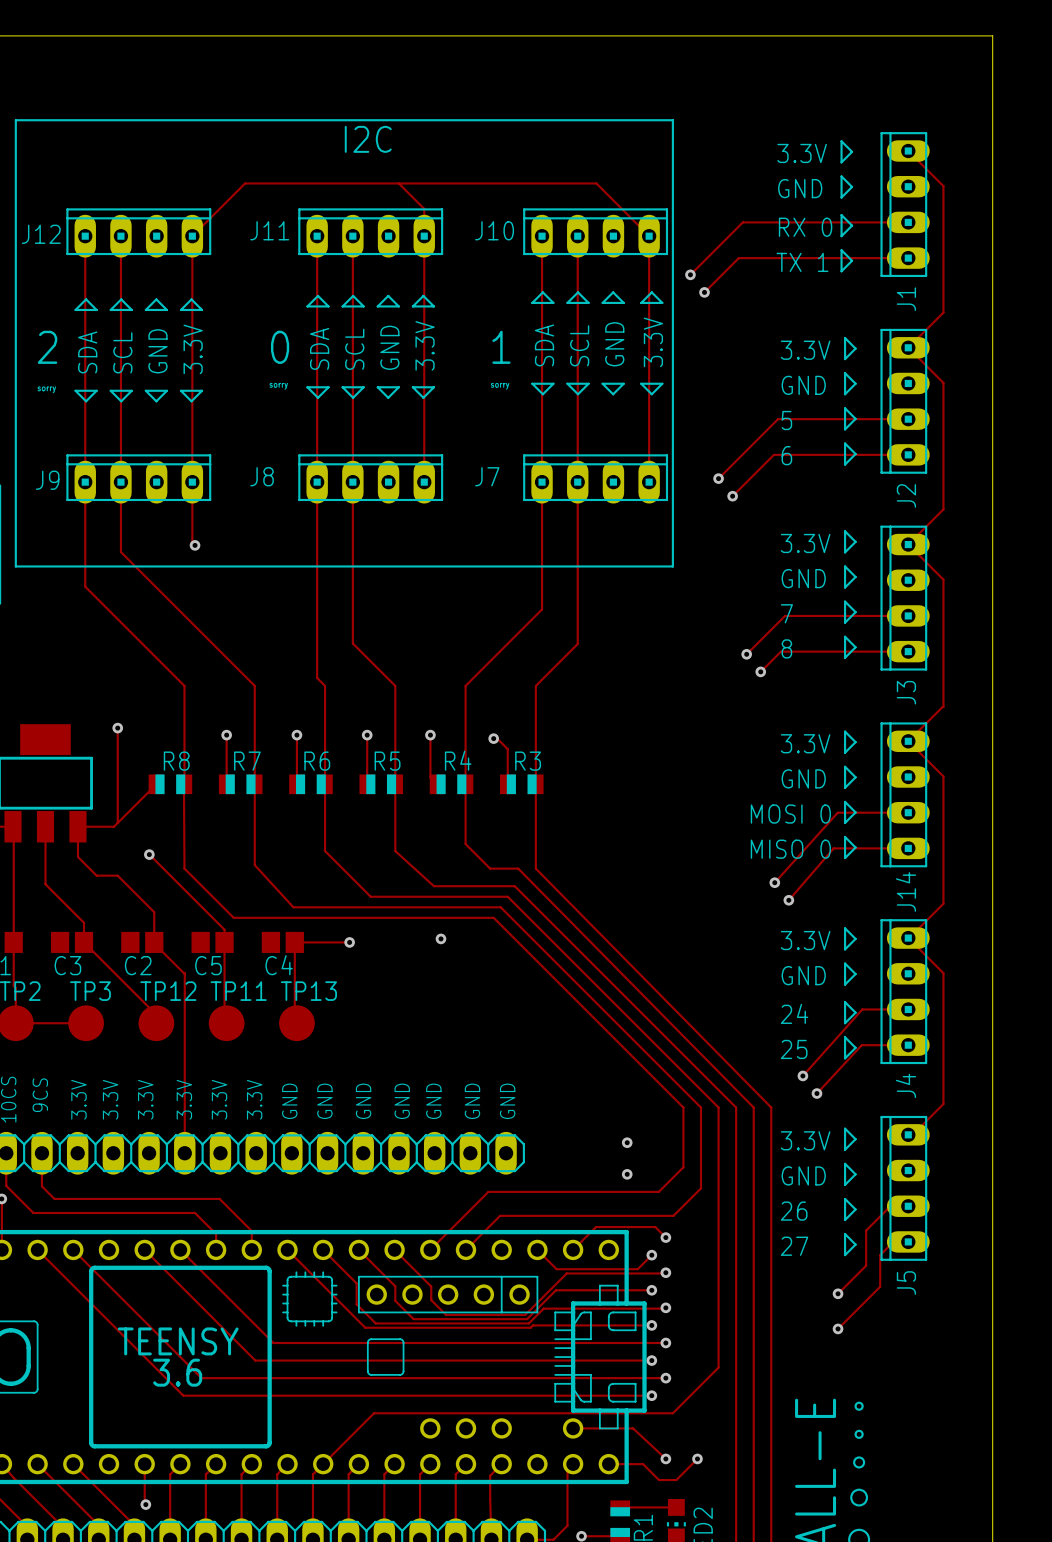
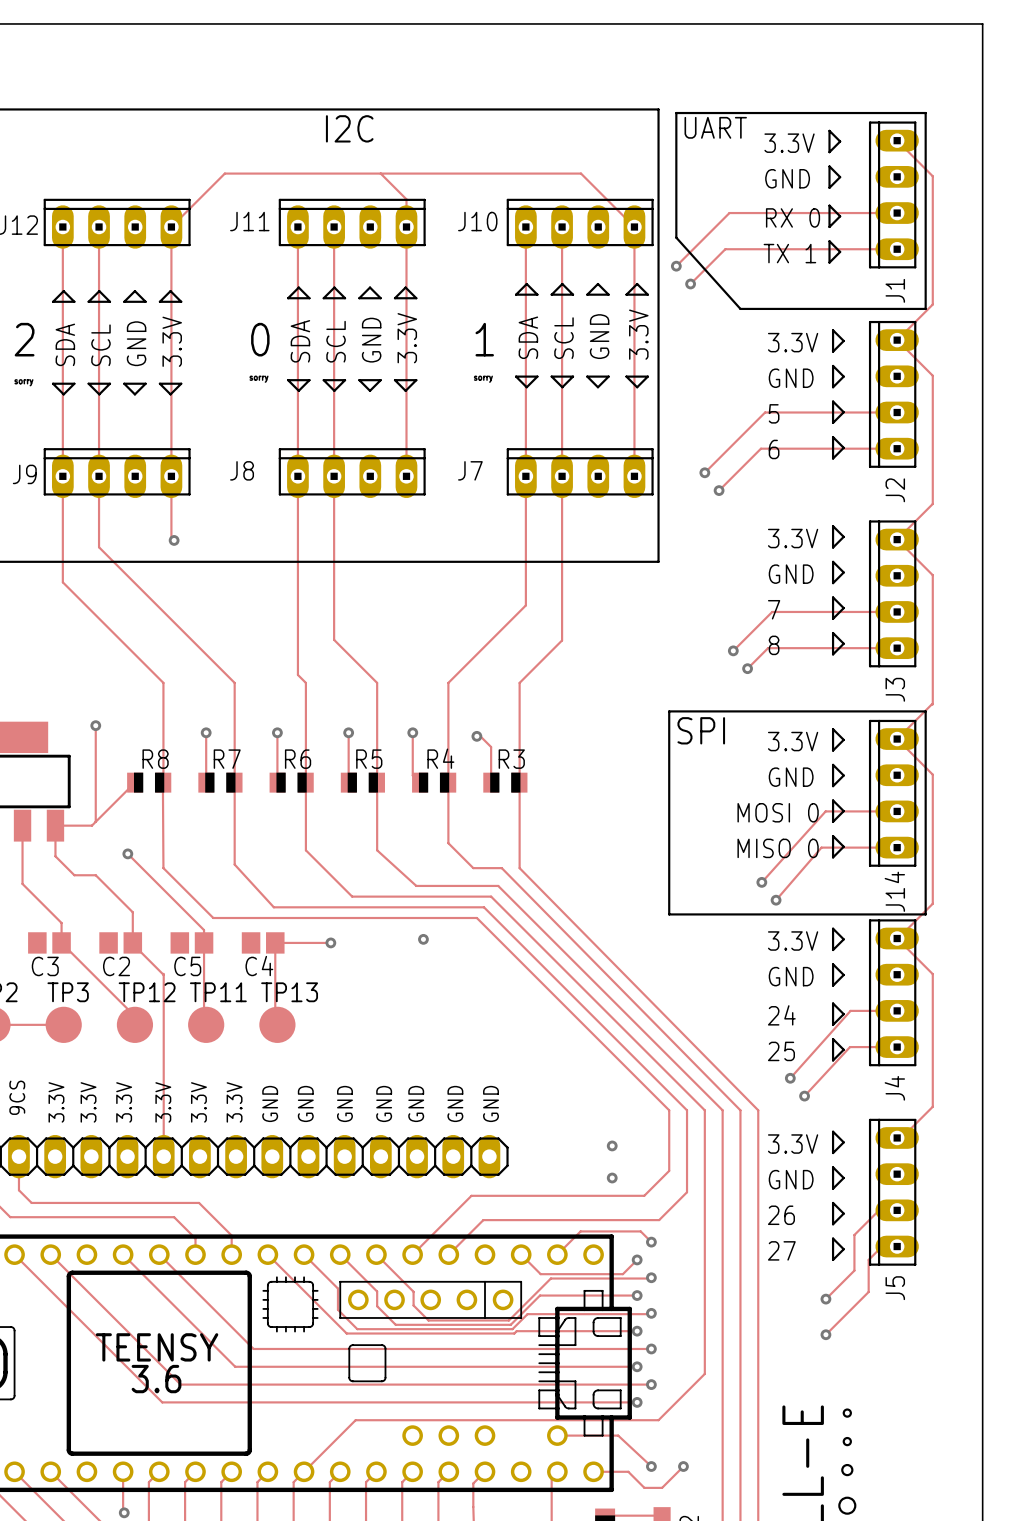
line: none -> (676, 113) (676, 237) (740, 308) (925, 308) (925, 113) (676, 113)
text: none -> UART (715, 127)
line: none -> (669, 711) (669, 914) (925, 914) (925, 711) (669, 711)
text: none -> SPI (701, 730)

